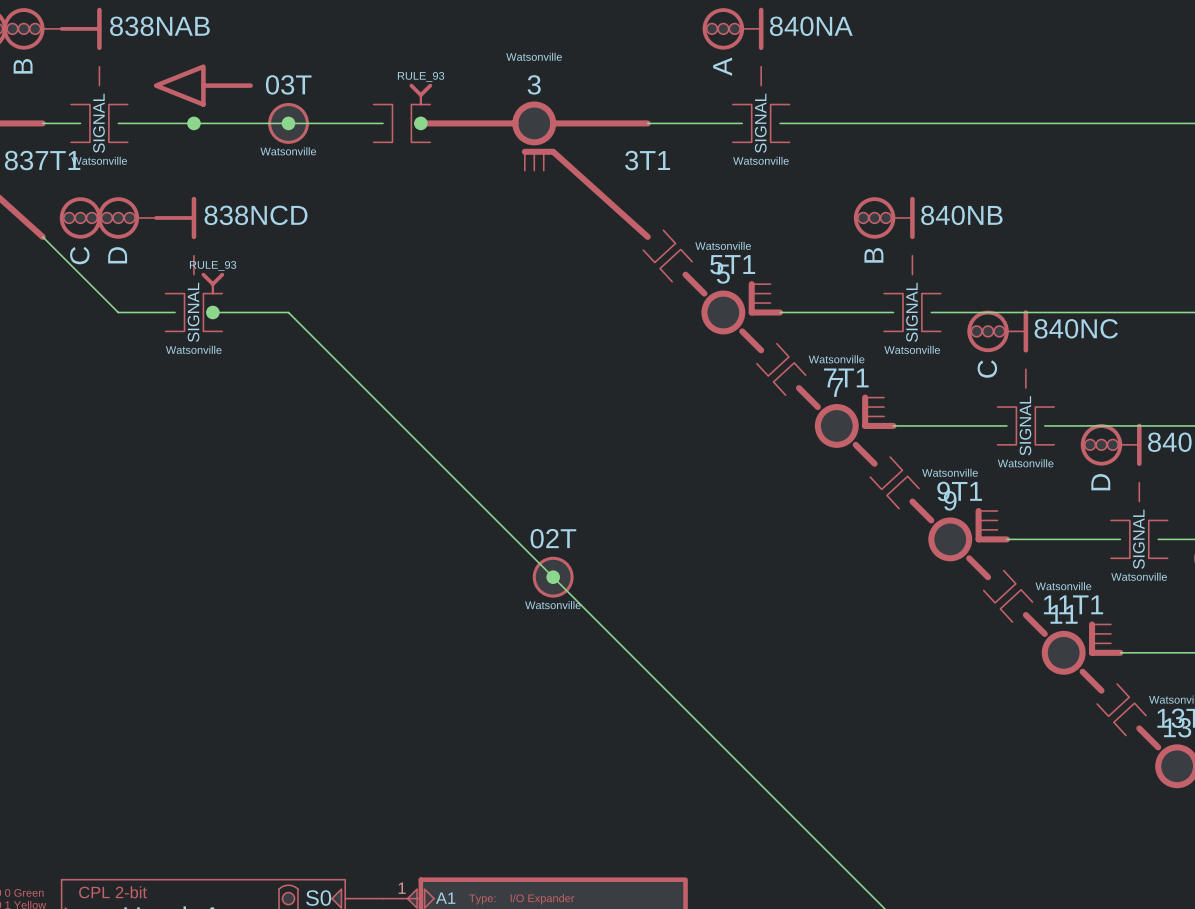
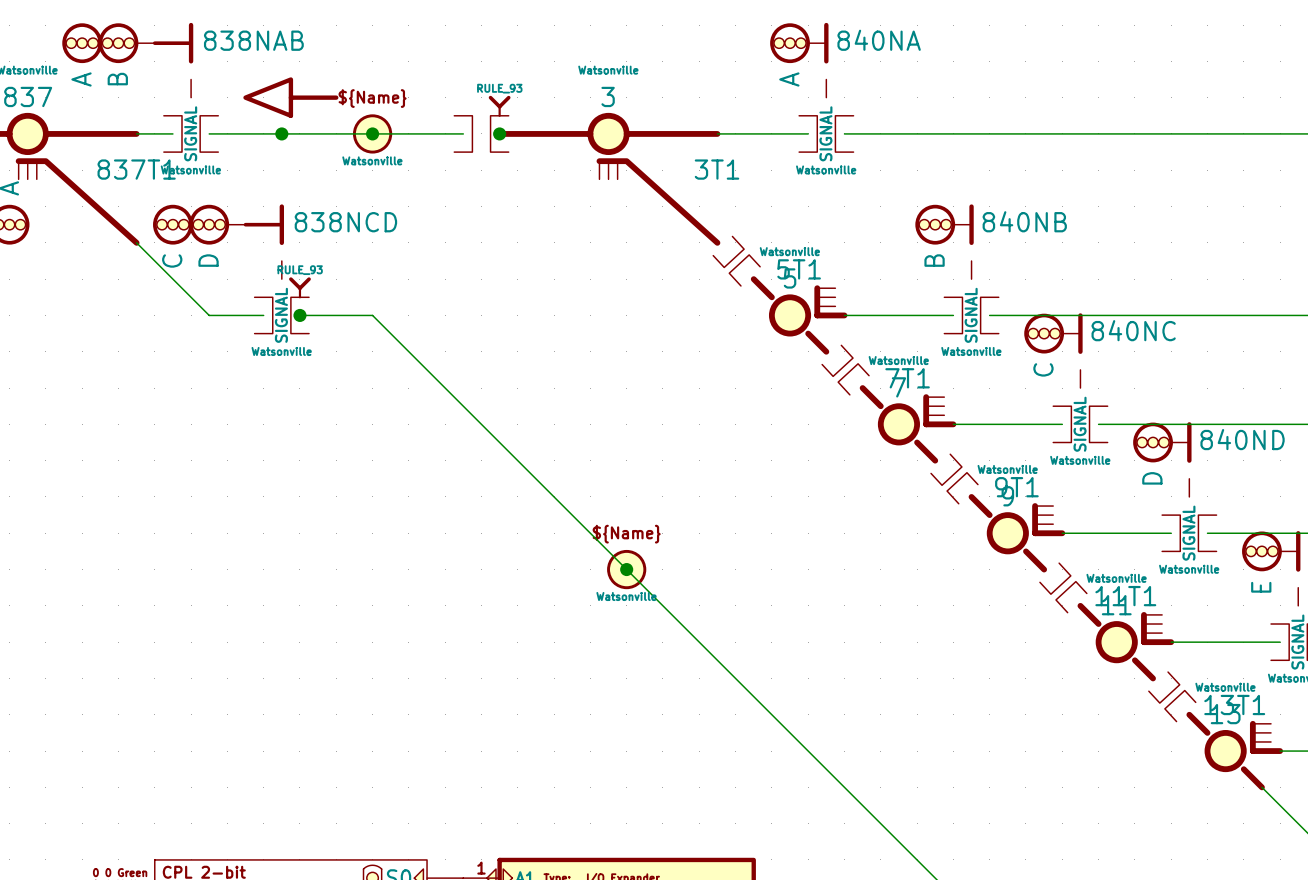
part value: 03T (288, 84) -> none
part text: none -> ${Name} (372, 98)
part value: 02T (553, 538) -> none
part text: none -> ${Name} (626, 534)

